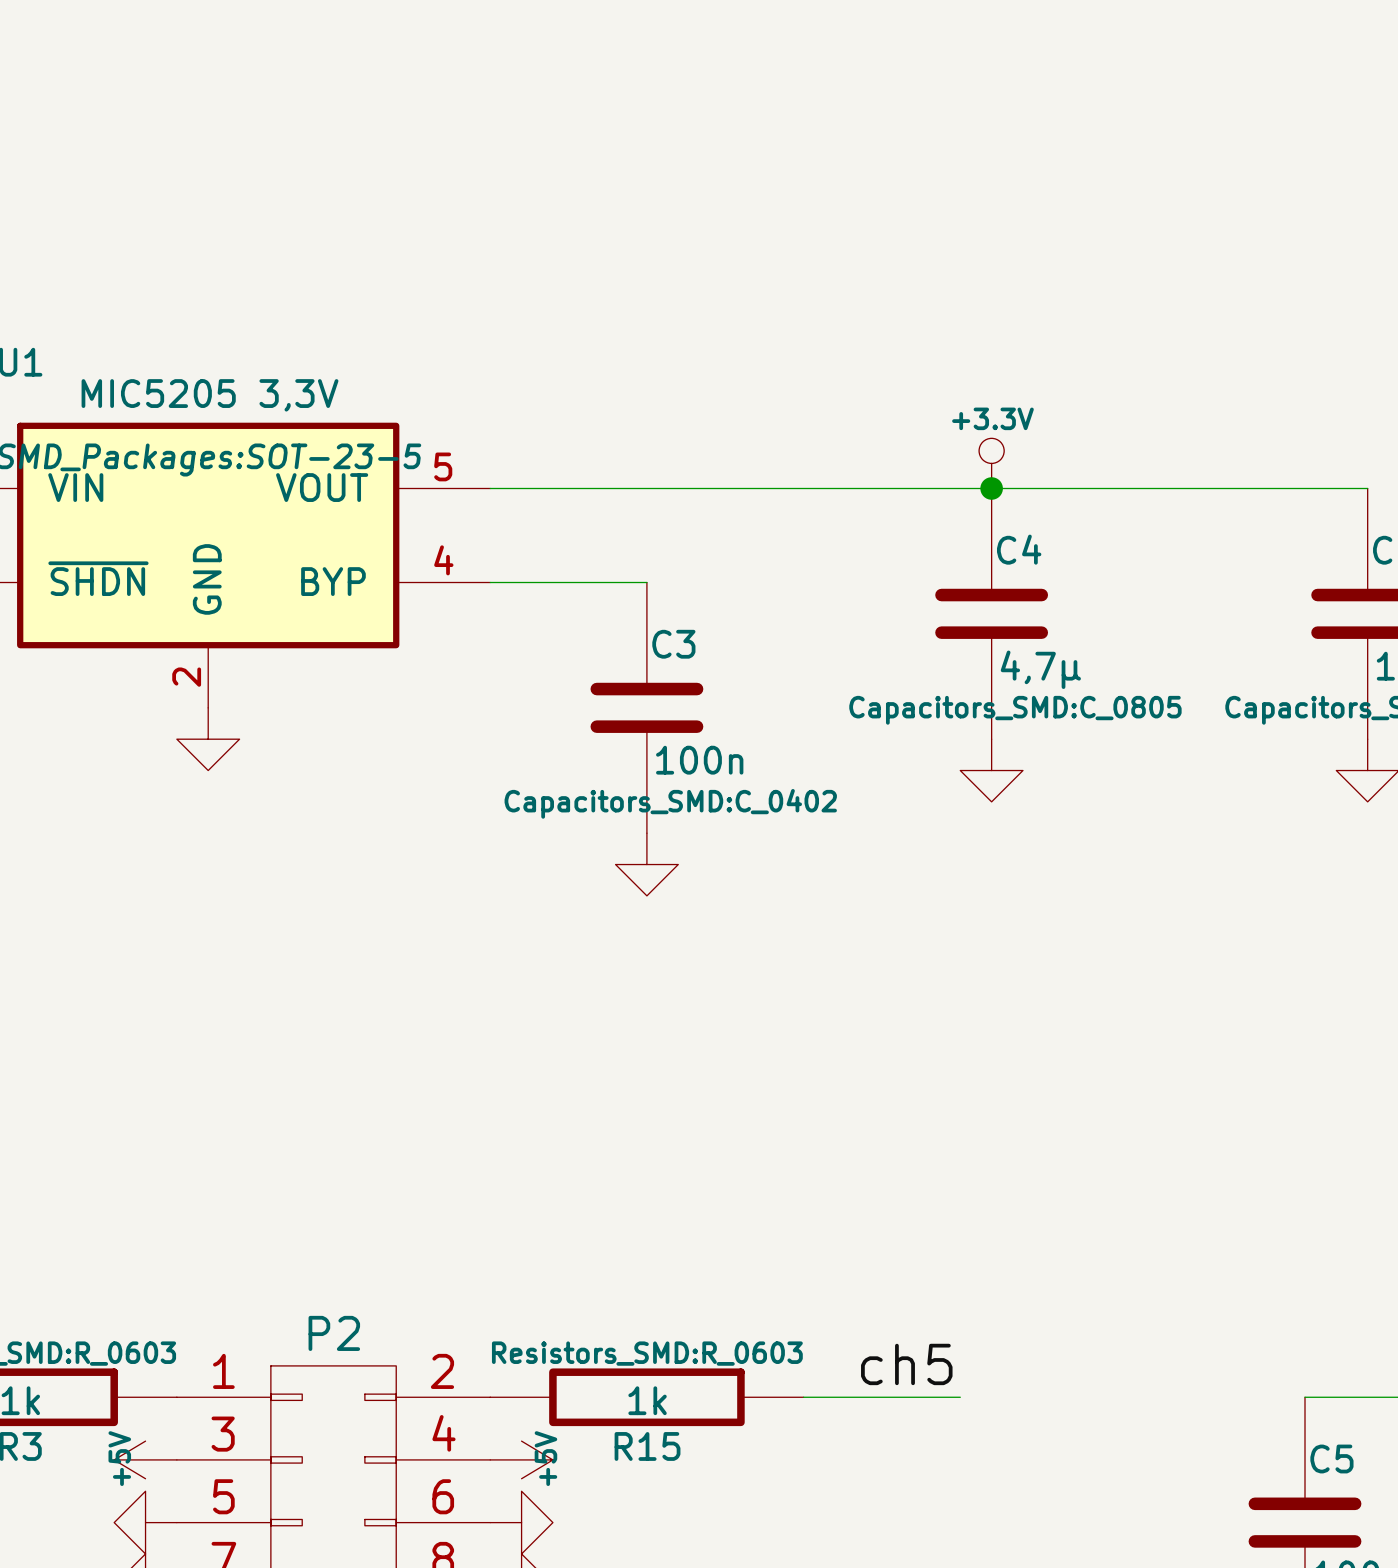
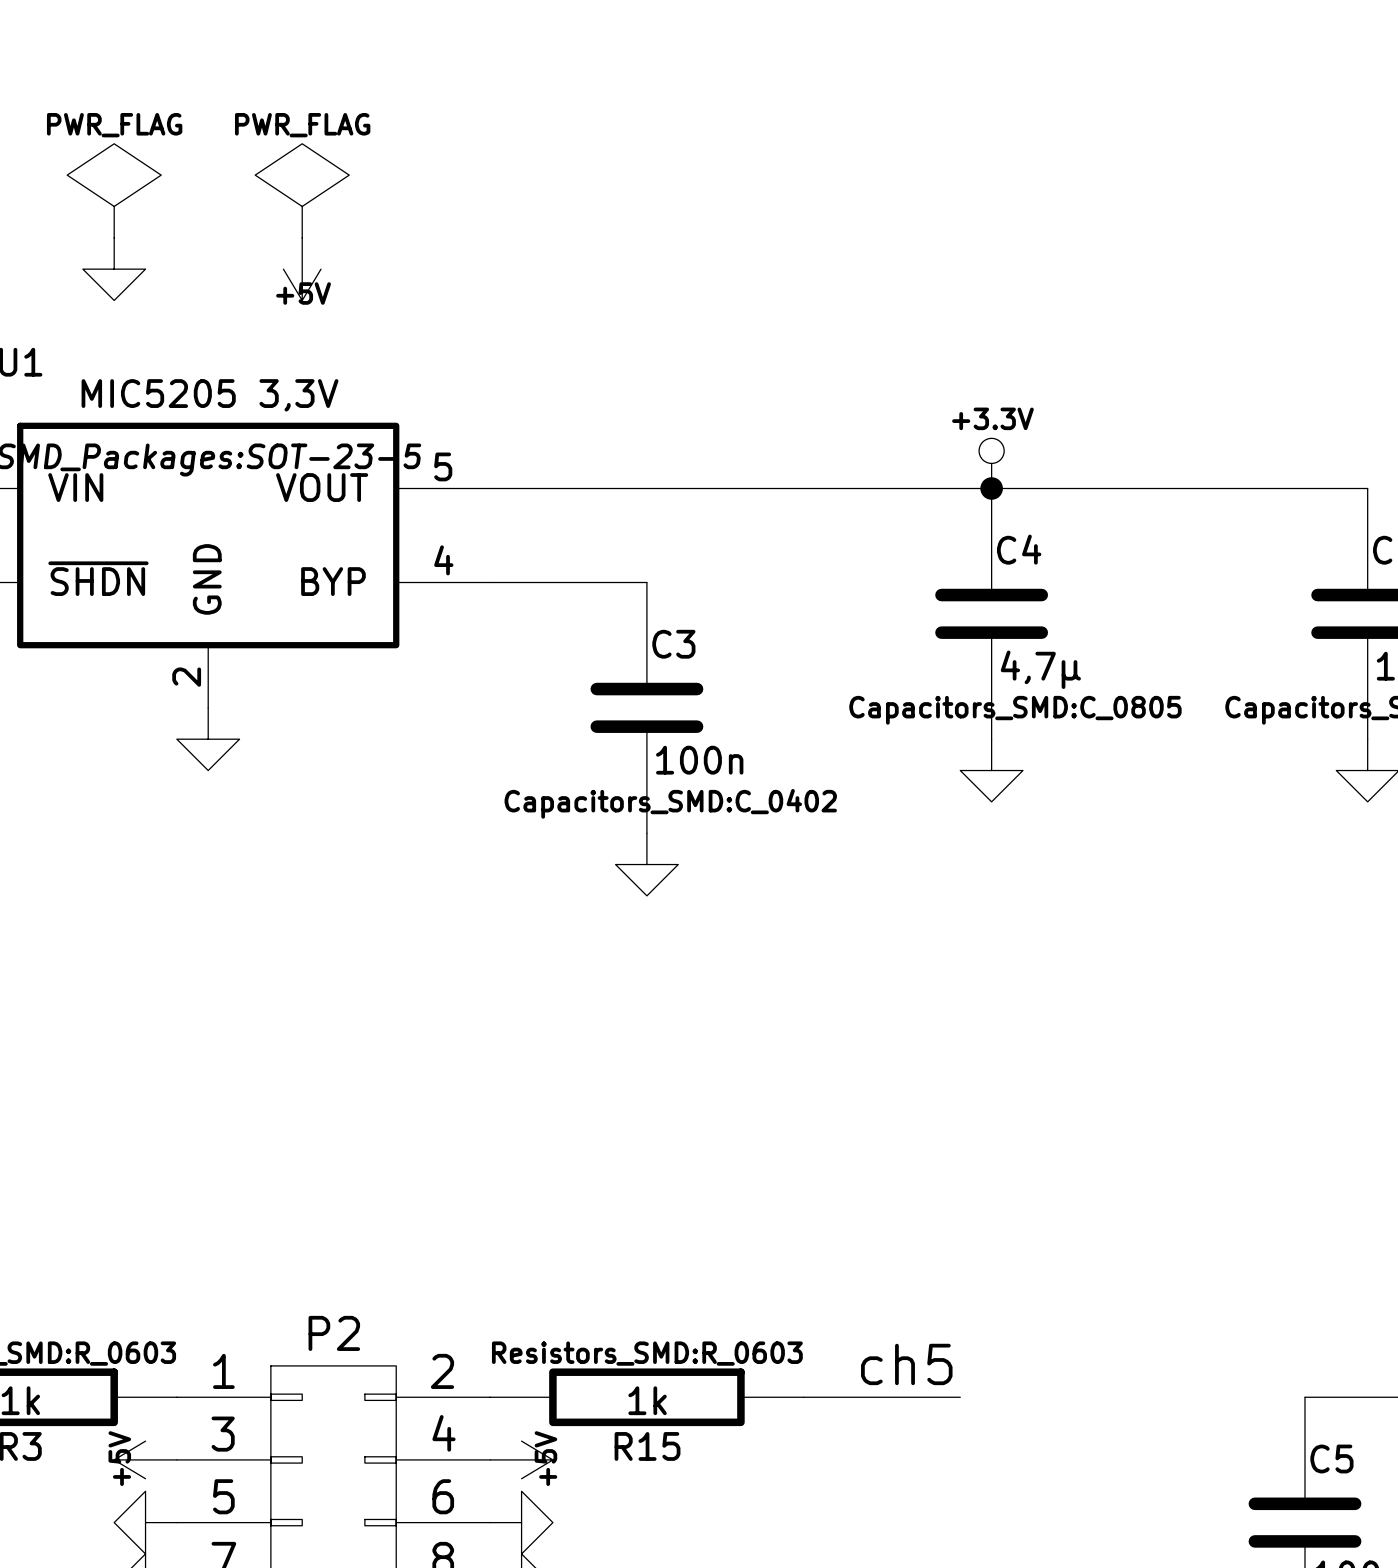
power symbol: none -> PWR_FLAG (114, 190)
power symbol: none -> PWR_FLAG (302, 190)
power symbol: none -> (114, 269)
power symbol: none -> +5V (302, 269)

